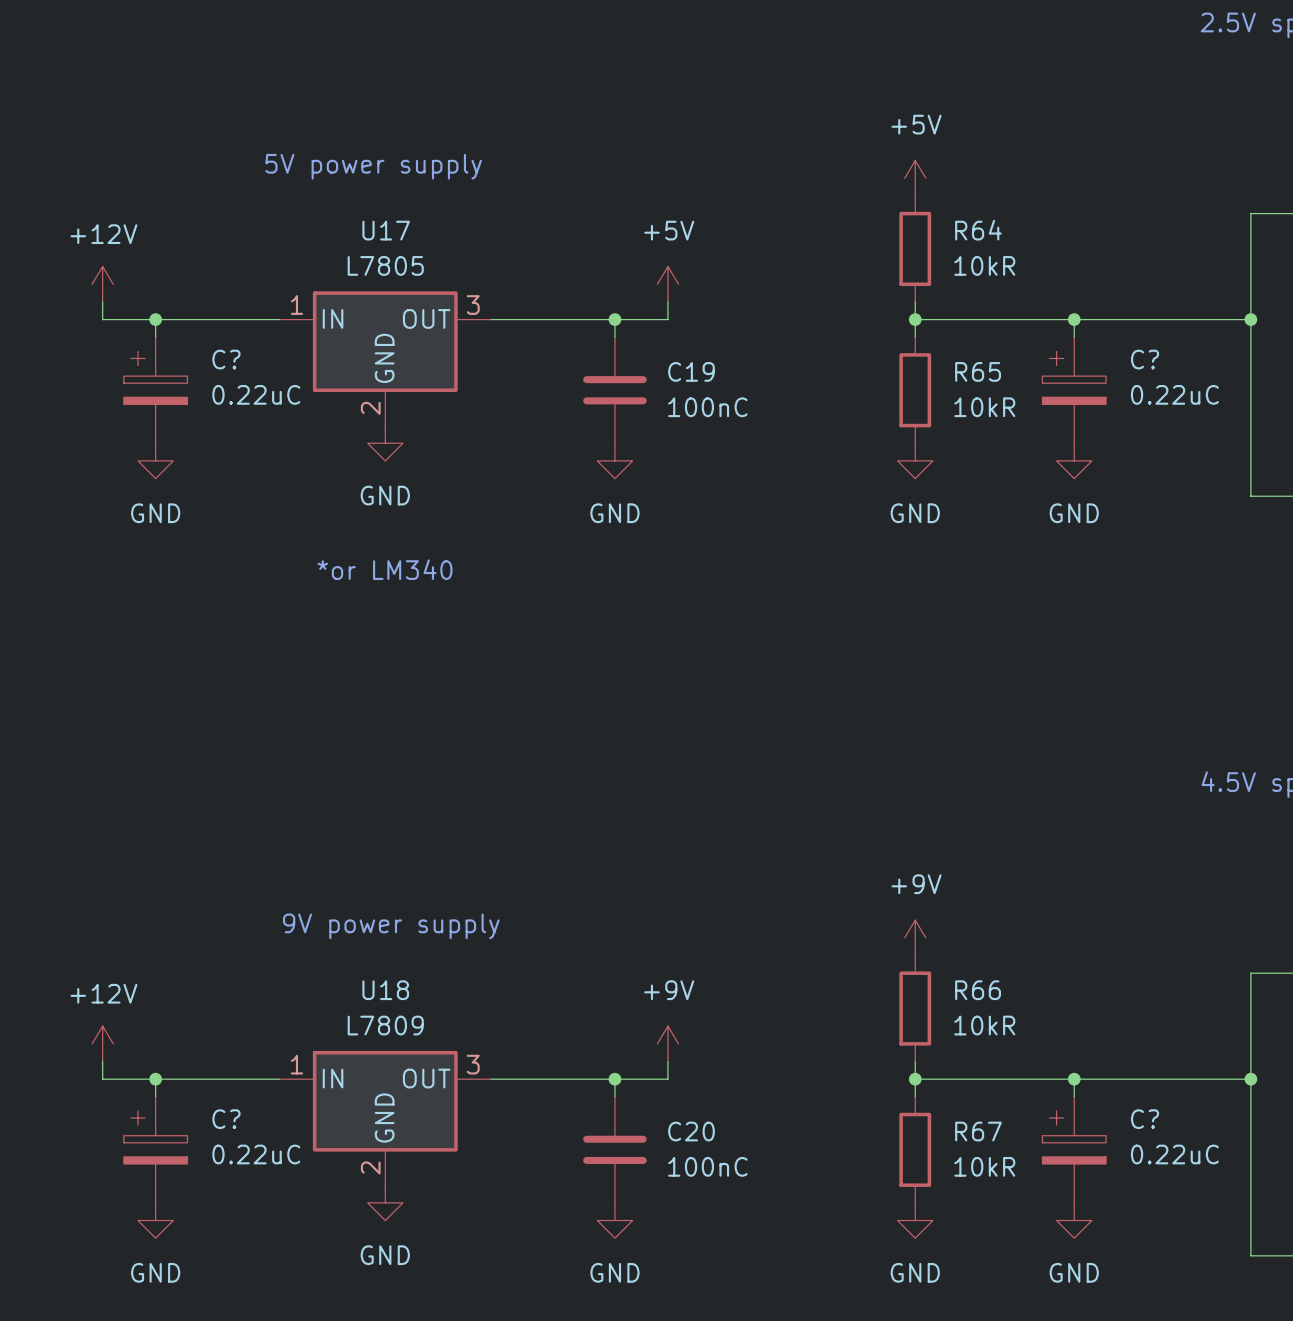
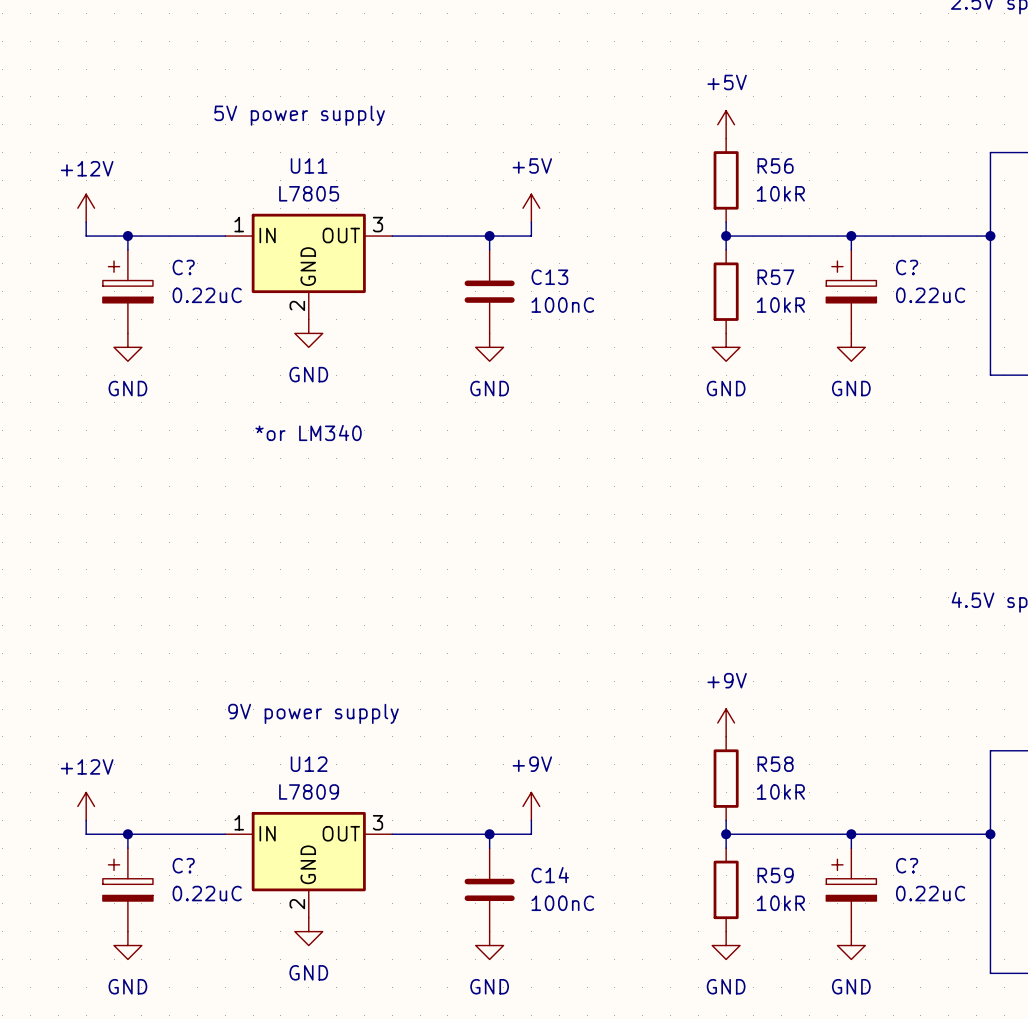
U17 name: U17 (386, 230) -> U11 (309, 165)
R64 name: R64 (978, 230) -> R56 (775, 165)
C19 name: C19 (691, 371) -> C13 (549, 277)
R65 name: R65 (978, 371) -> R57 (775, 277)
U18 name: U18 (385, 990) -> U12 (309, 764)
R66 name: R66 (978, 990) -> R58 (775, 764)
C20 name: C20 (691, 1131) -> C14 (550, 875)
R67 name: R67 (978, 1131) -> R59 (775, 875)

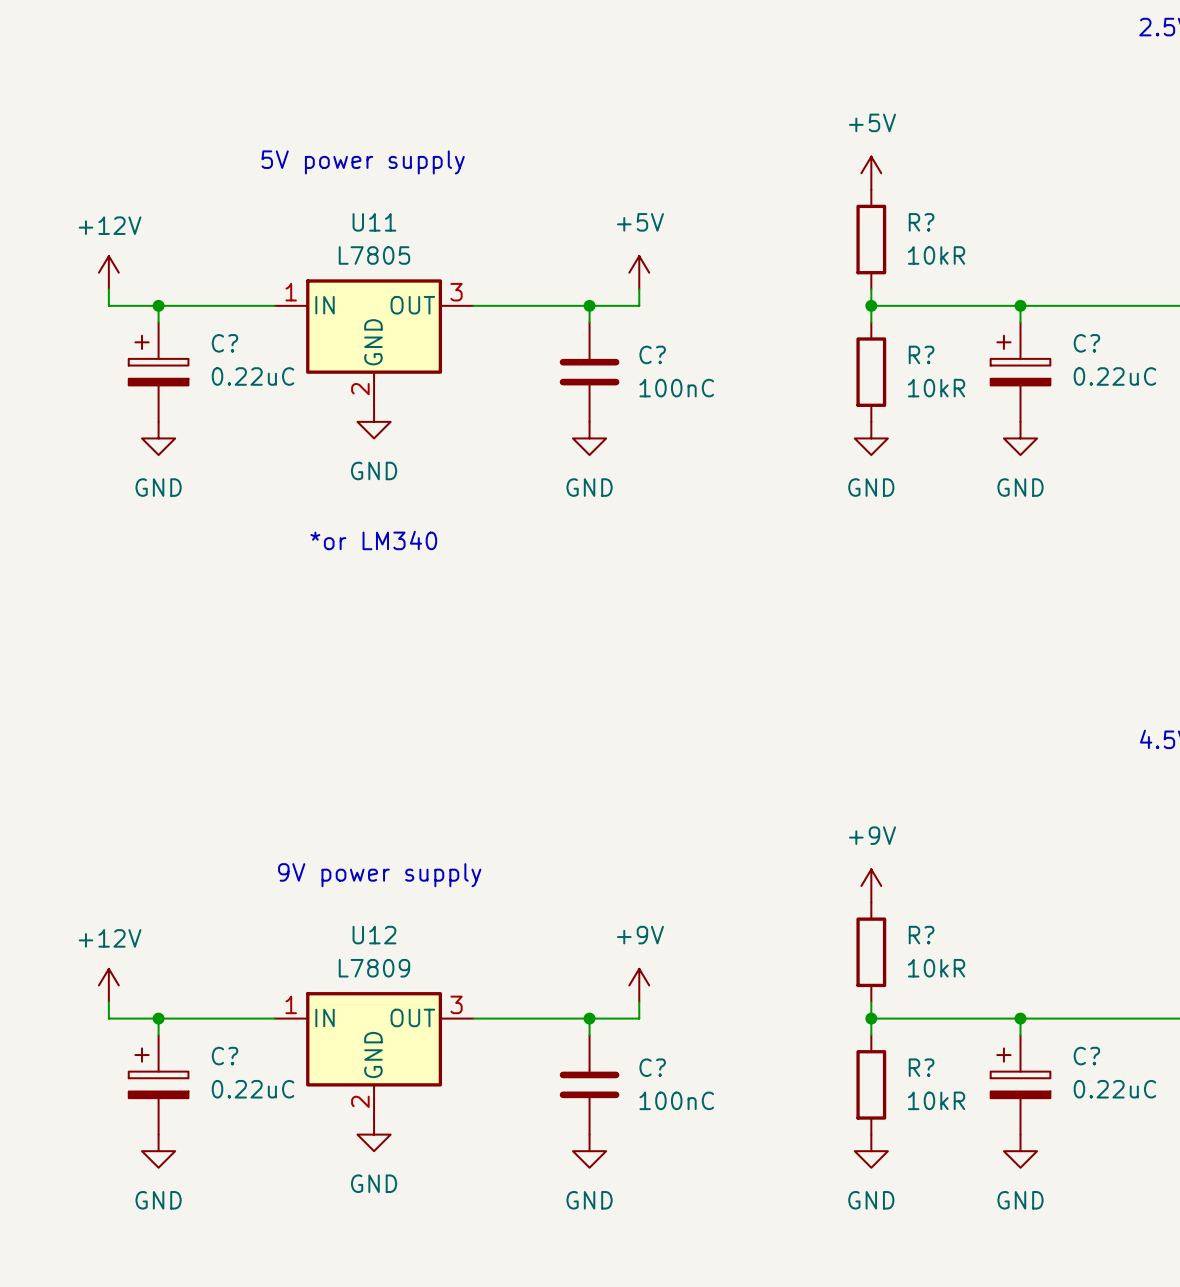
R56 name: R56 (775, 165) -> R? (921, 222)
C13 name: C13 (549, 277) -> C? (652, 354)
R57 name: R57 (775, 277) -> R? (921, 354)
R58 name: R58 (775, 764) -> R? (921, 935)
C14 name: C14 (550, 875) -> C? (652, 1067)
R59 name: R59 (775, 875) -> R? (921, 1067)

